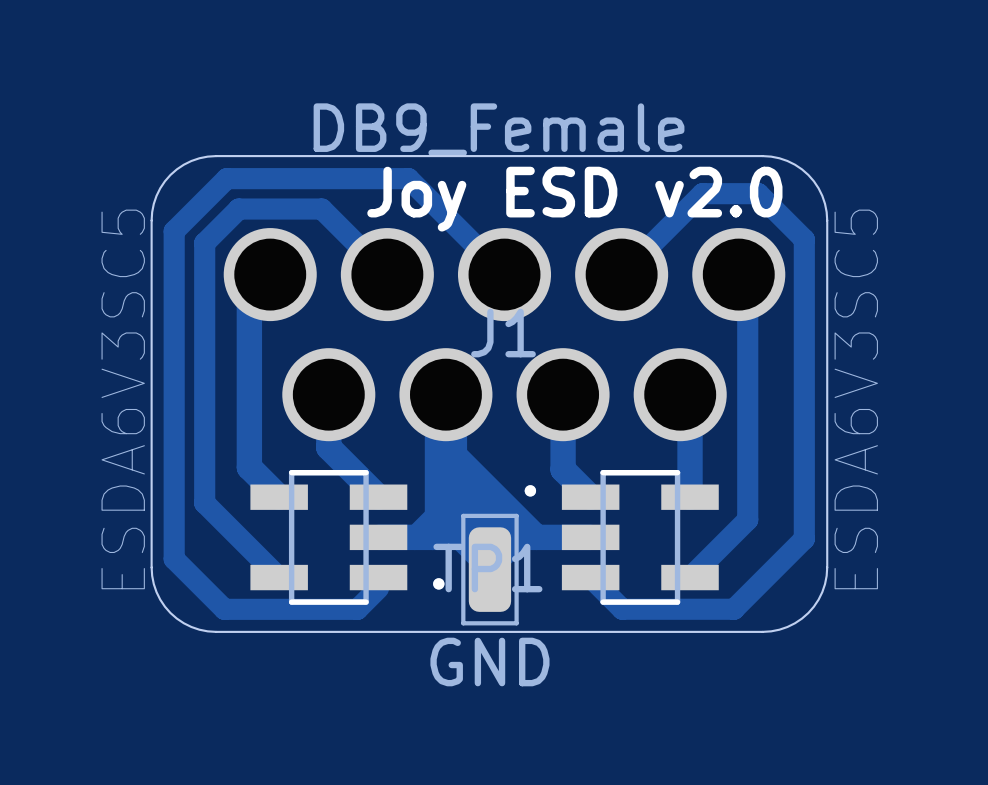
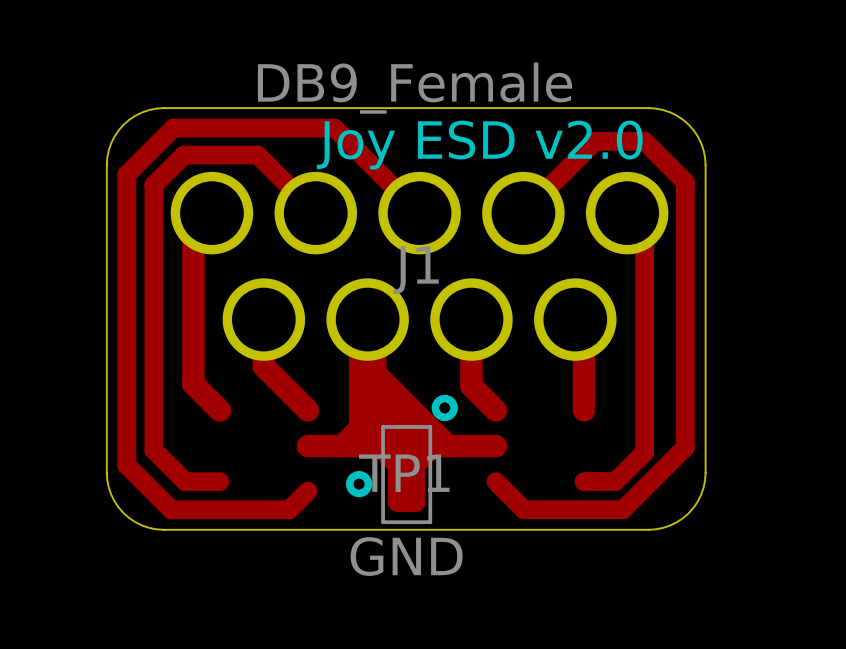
track: (747, 283) (747, 519) (690, 577) -> (635, 221) (644, 230) (644, 452) (615, 481) (583, 481)
drawing: none -> [431, 394, 458, 422]
track: (204, 503) (279, 577) -> (153, 415) (153, 450) (185, 481) (219, 481)
part: ESDA6V3SC5 (347, 537) -> none
part: ESDA6V3SC5 (621, 537) -> none
drawing: none -> [345, 470, 373, 498]

